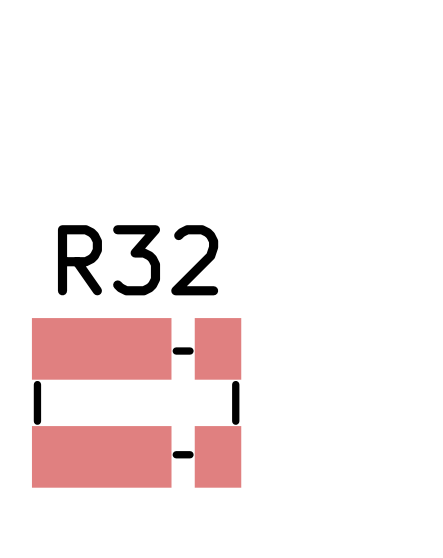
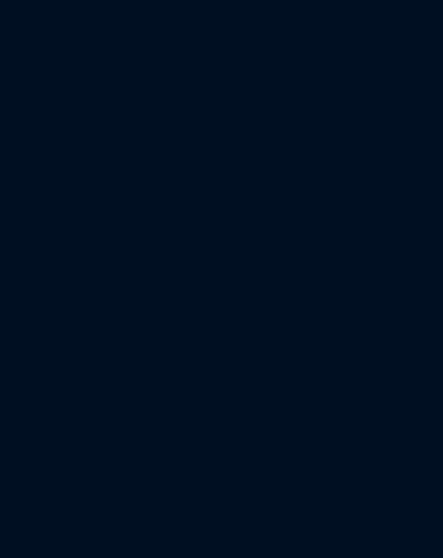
R32: (136, 402) -> none

